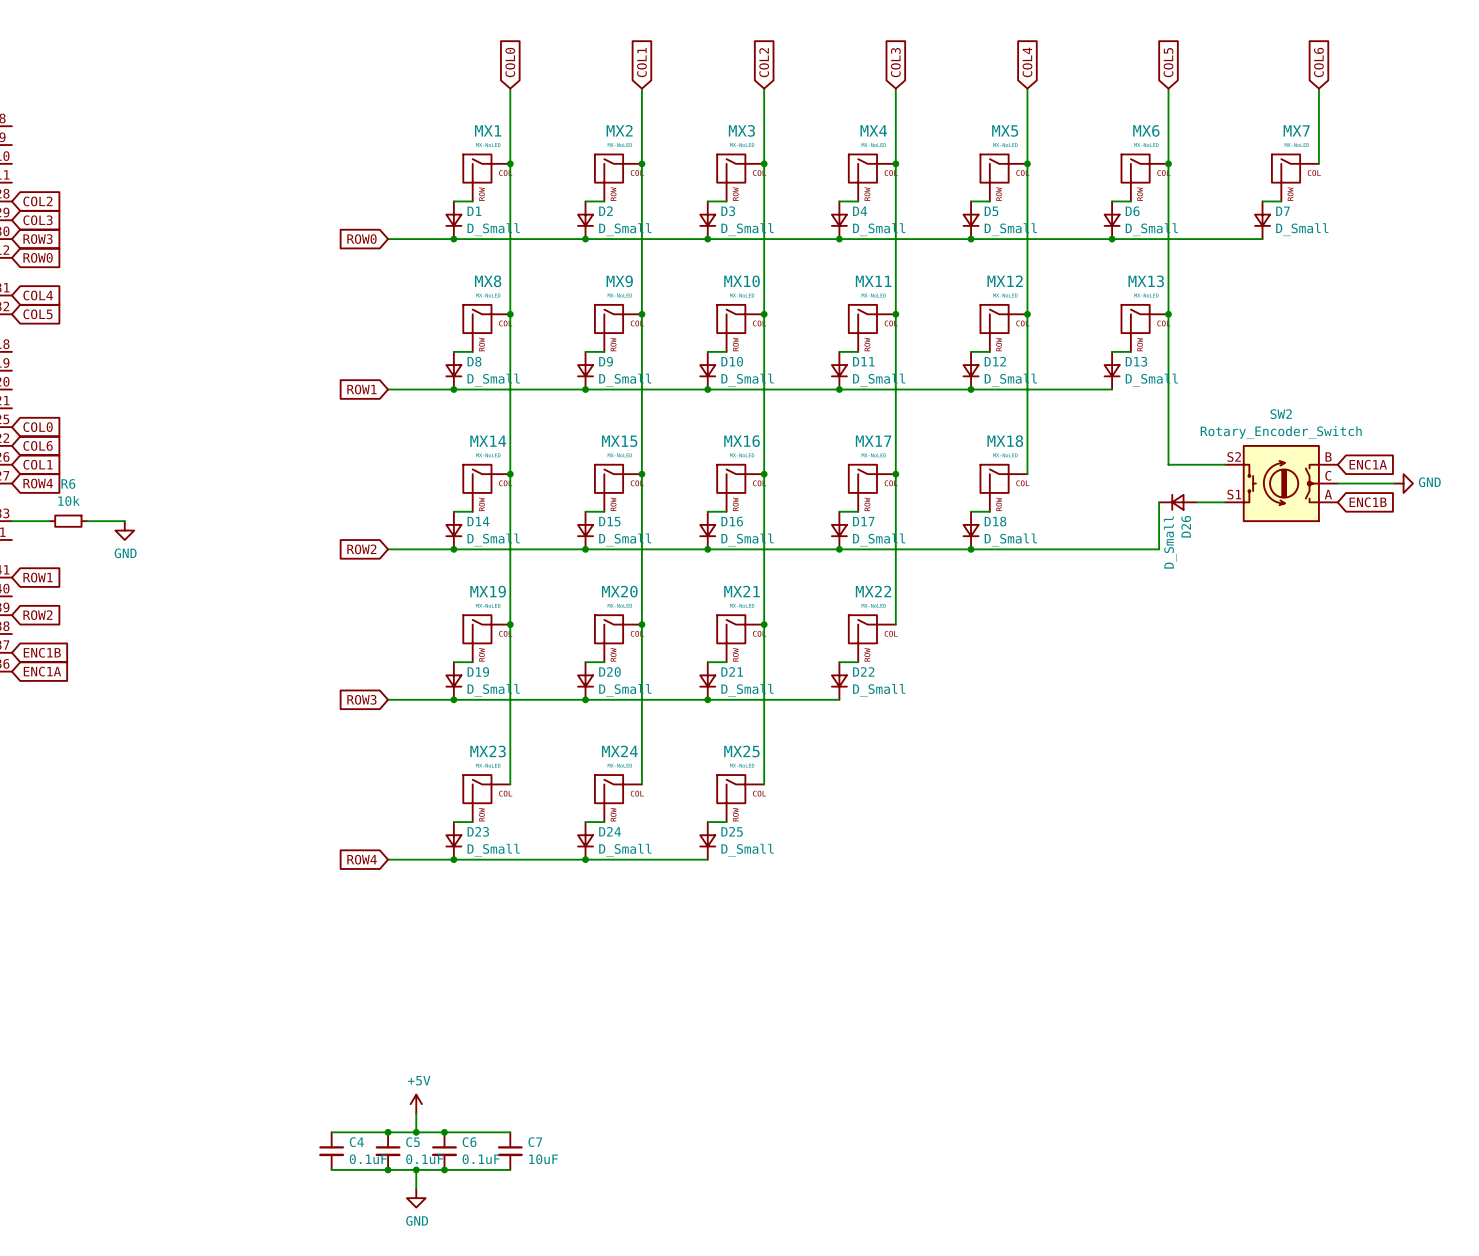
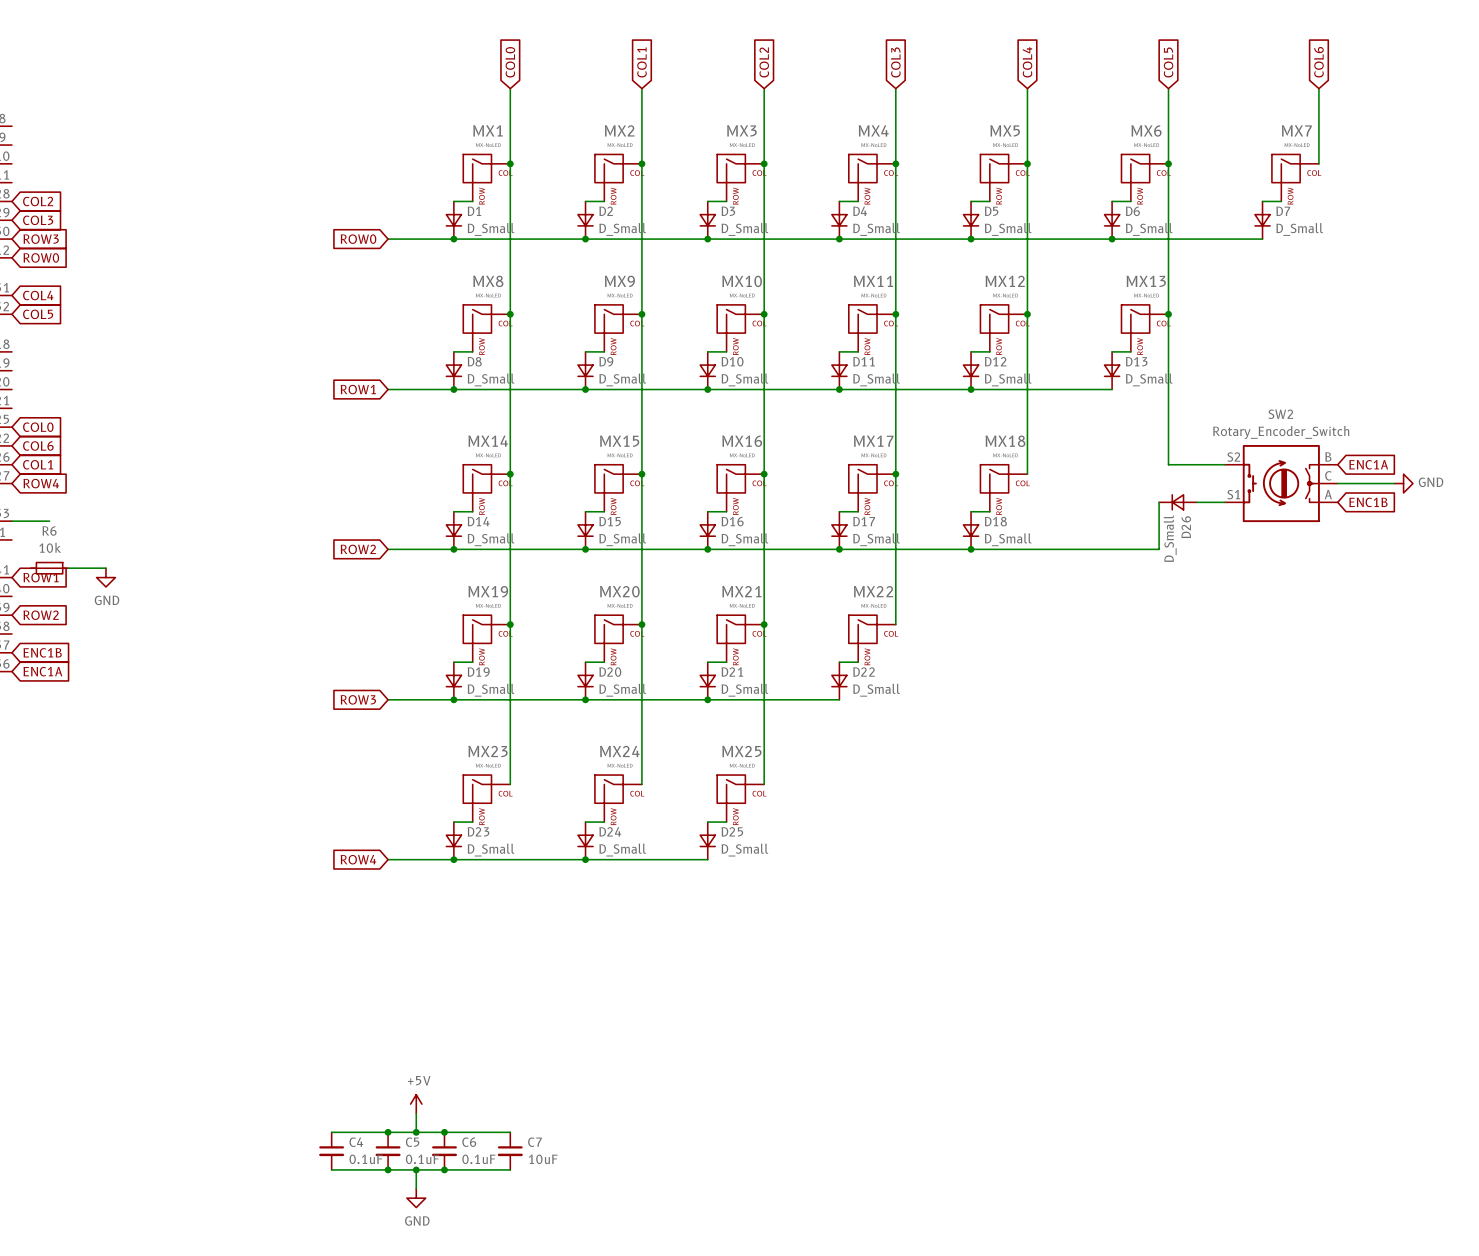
R6 position: (68, 521) -> (49, 568)
wire: (87, 521) (124, 521) -> (68, 568) (105, 568)
power symbol position: GND (124, 530) -> GND (105, 577)

